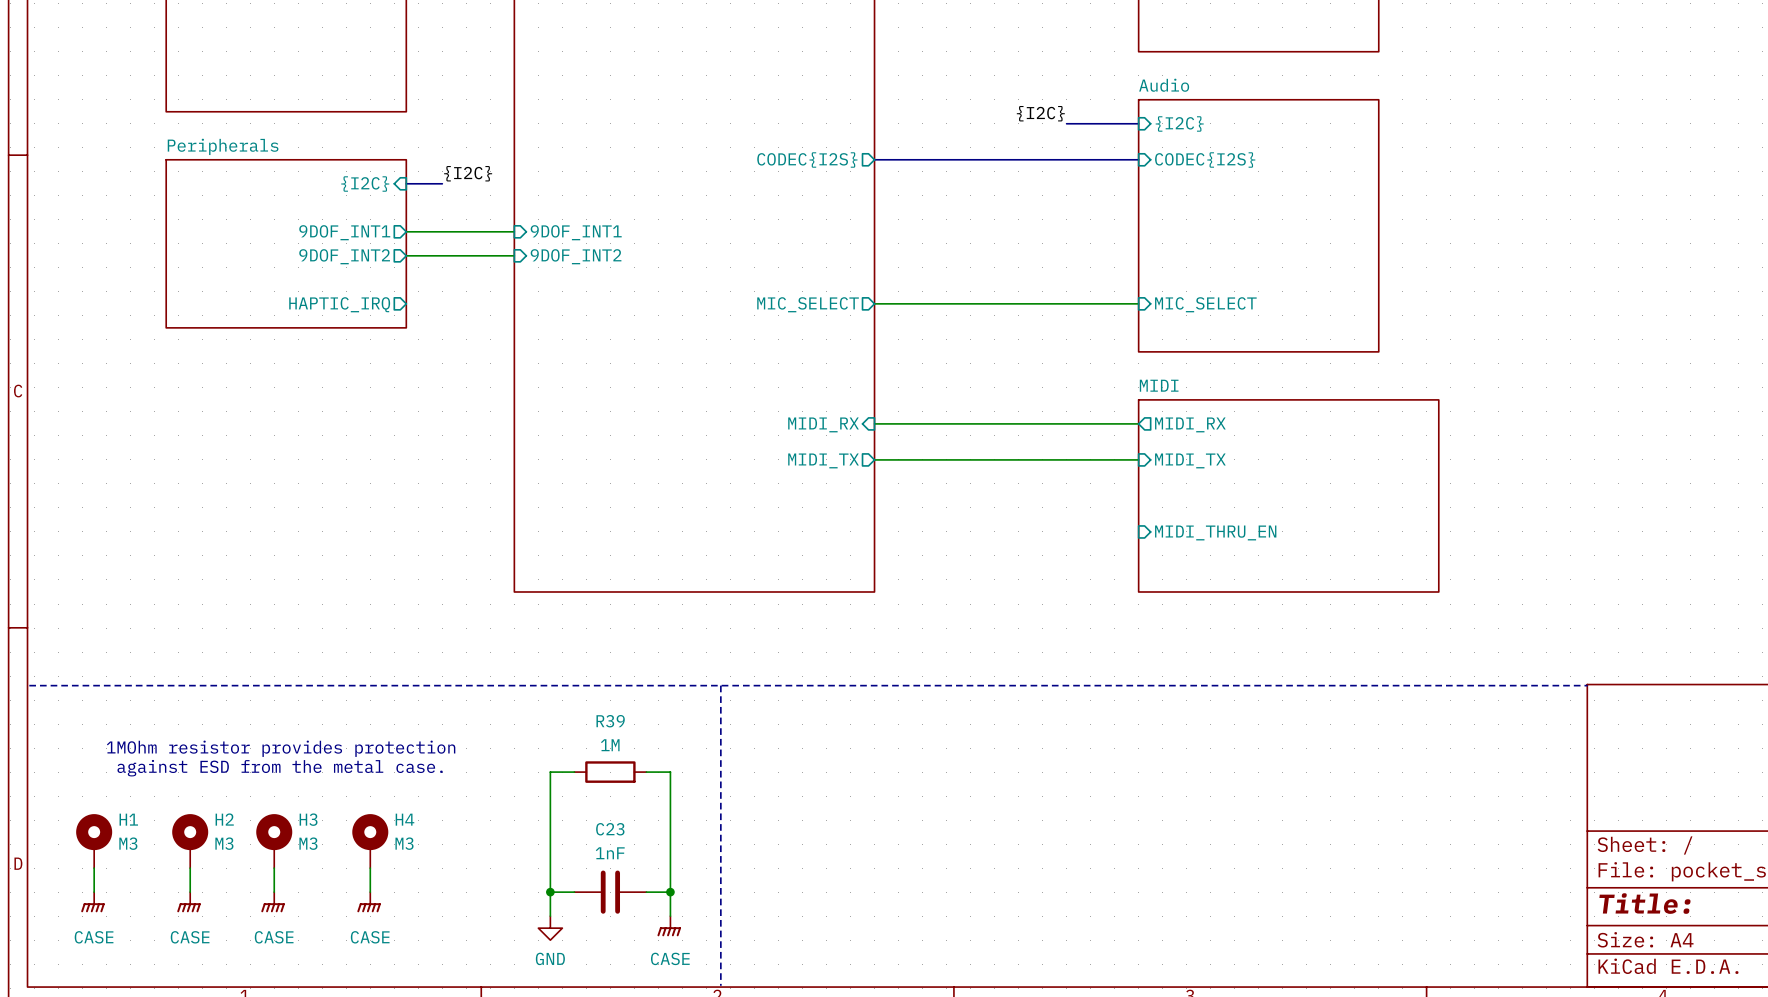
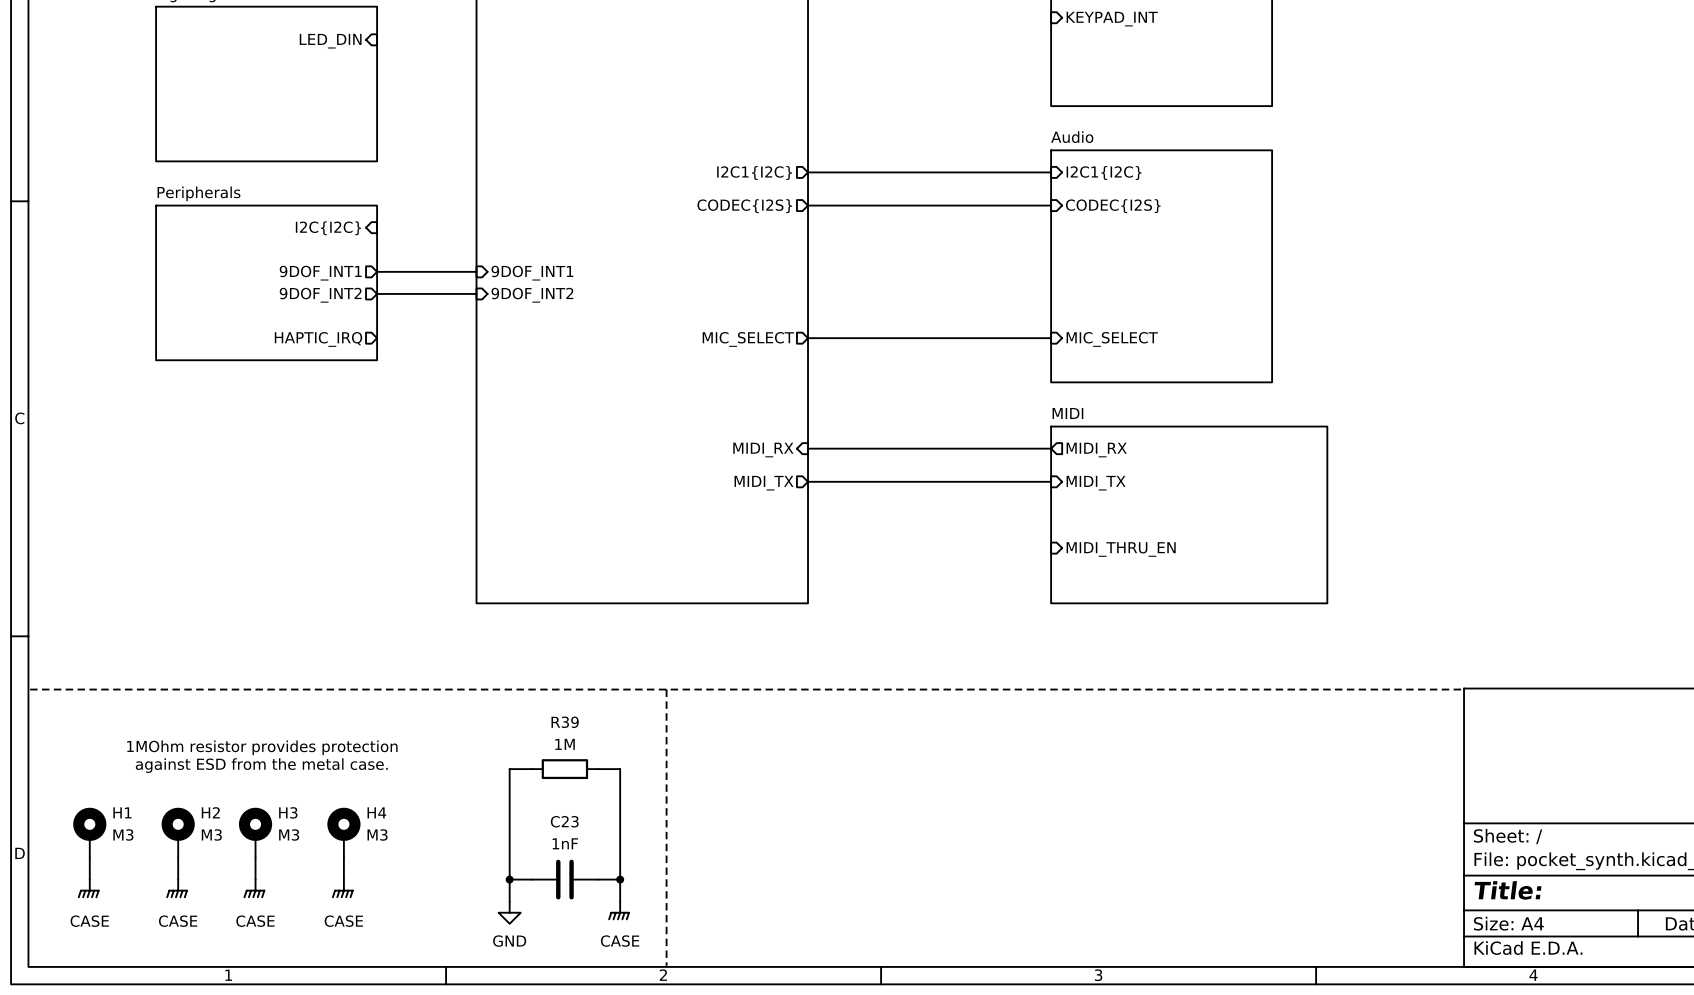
label: {I2C} (1040, 113) -> none
sheet pin: none -> I2C1{I2C} (754, 173)
bus: none -> (808, 172) (984, 172)
sheet pin: {I2C} (1179, 123) -> I2C1{I2C} (1104, 173)
label: {I2C} (468, 173) -> none
bus: (406, 183) (442, 183) -> none
sheet pin: {I2C} (365, 184) -> I2C{I2C} (328, 228)

